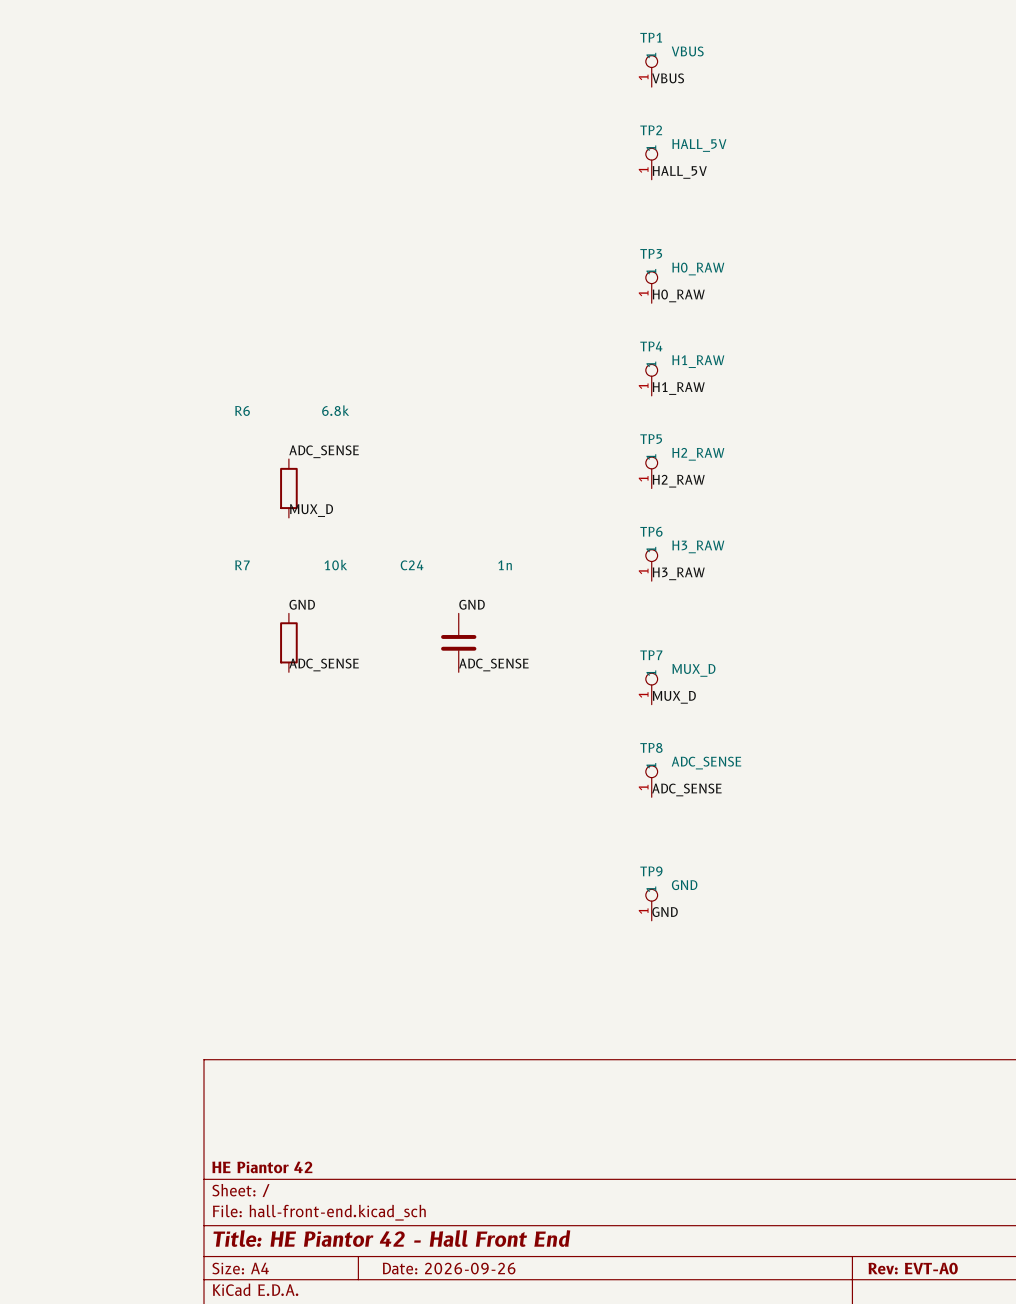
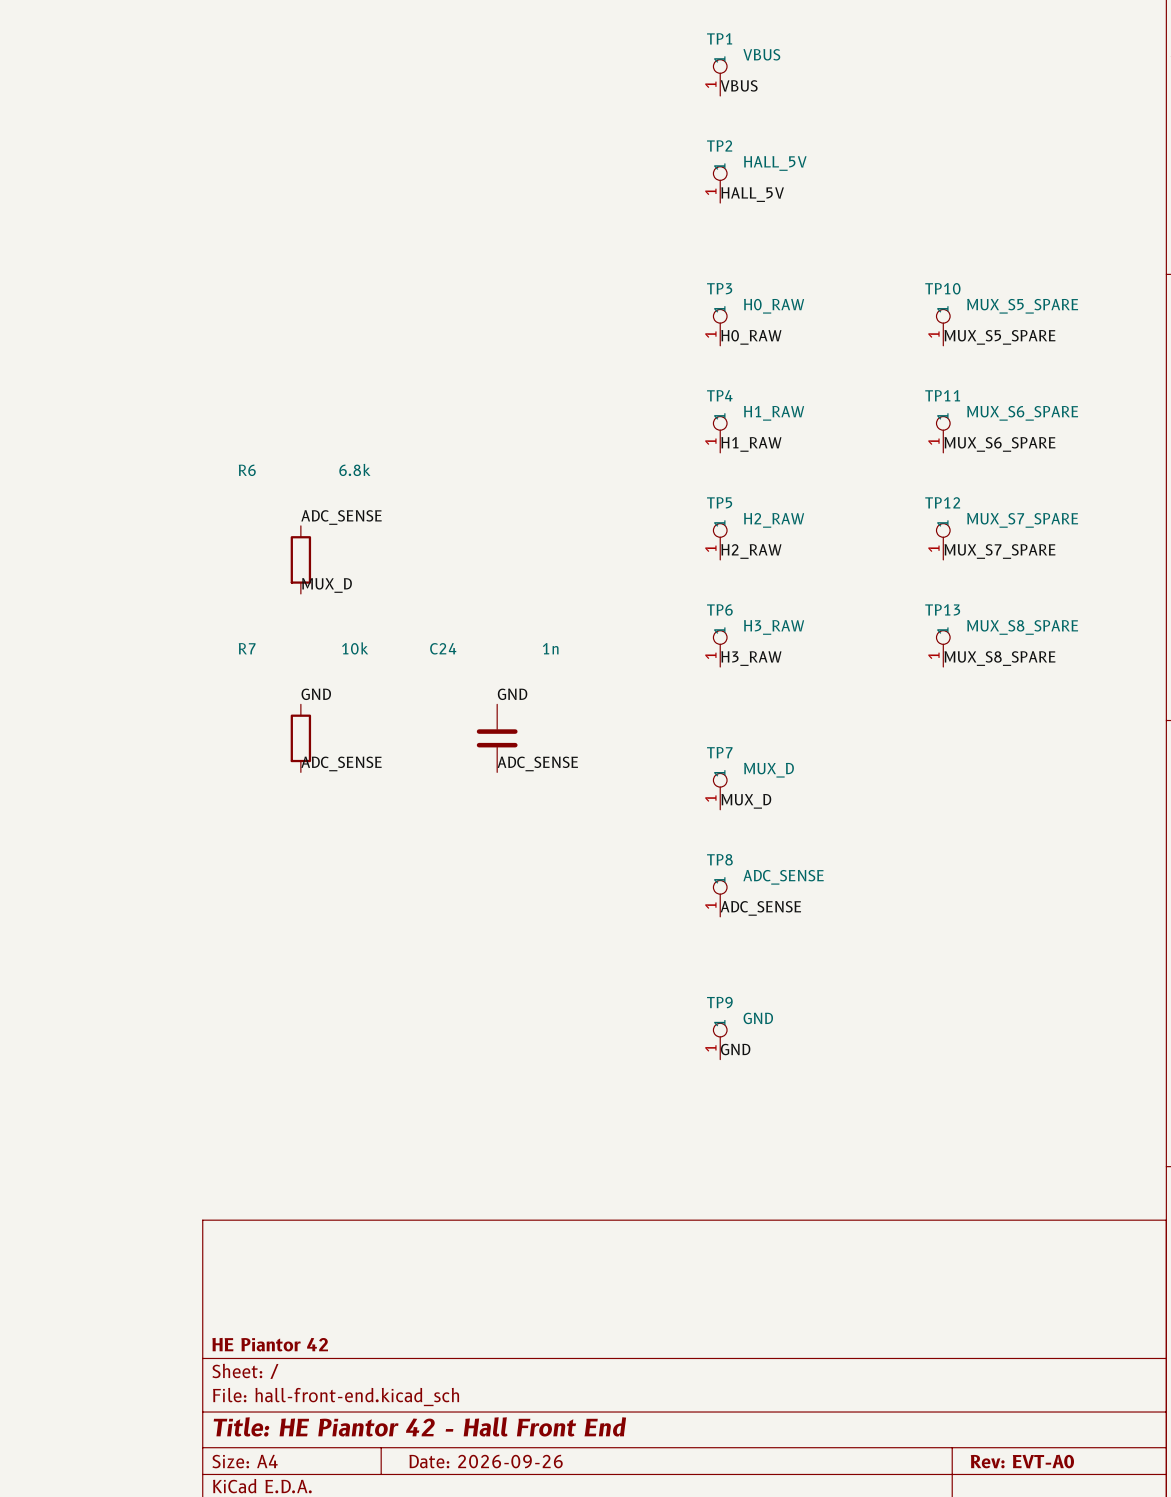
TP10: none -> MUX_S5_SPARE (943, 327)
label: none -> MUX_S5_SPARE (1000, 337)
TP11: none -> MUX_S6_SPARE (943, 434)
label: none -> MUX_S6_SPARE (1000, 444)
TP12: none -> MUX_S7_SPARE (943, 541)
label: none -> MUX_S7_SPARE (1000, 551)
TP13: none -> MUX_S8_SPARE (943, 648)
label: none -> MUX_S8_SPARE (1000, 658)

